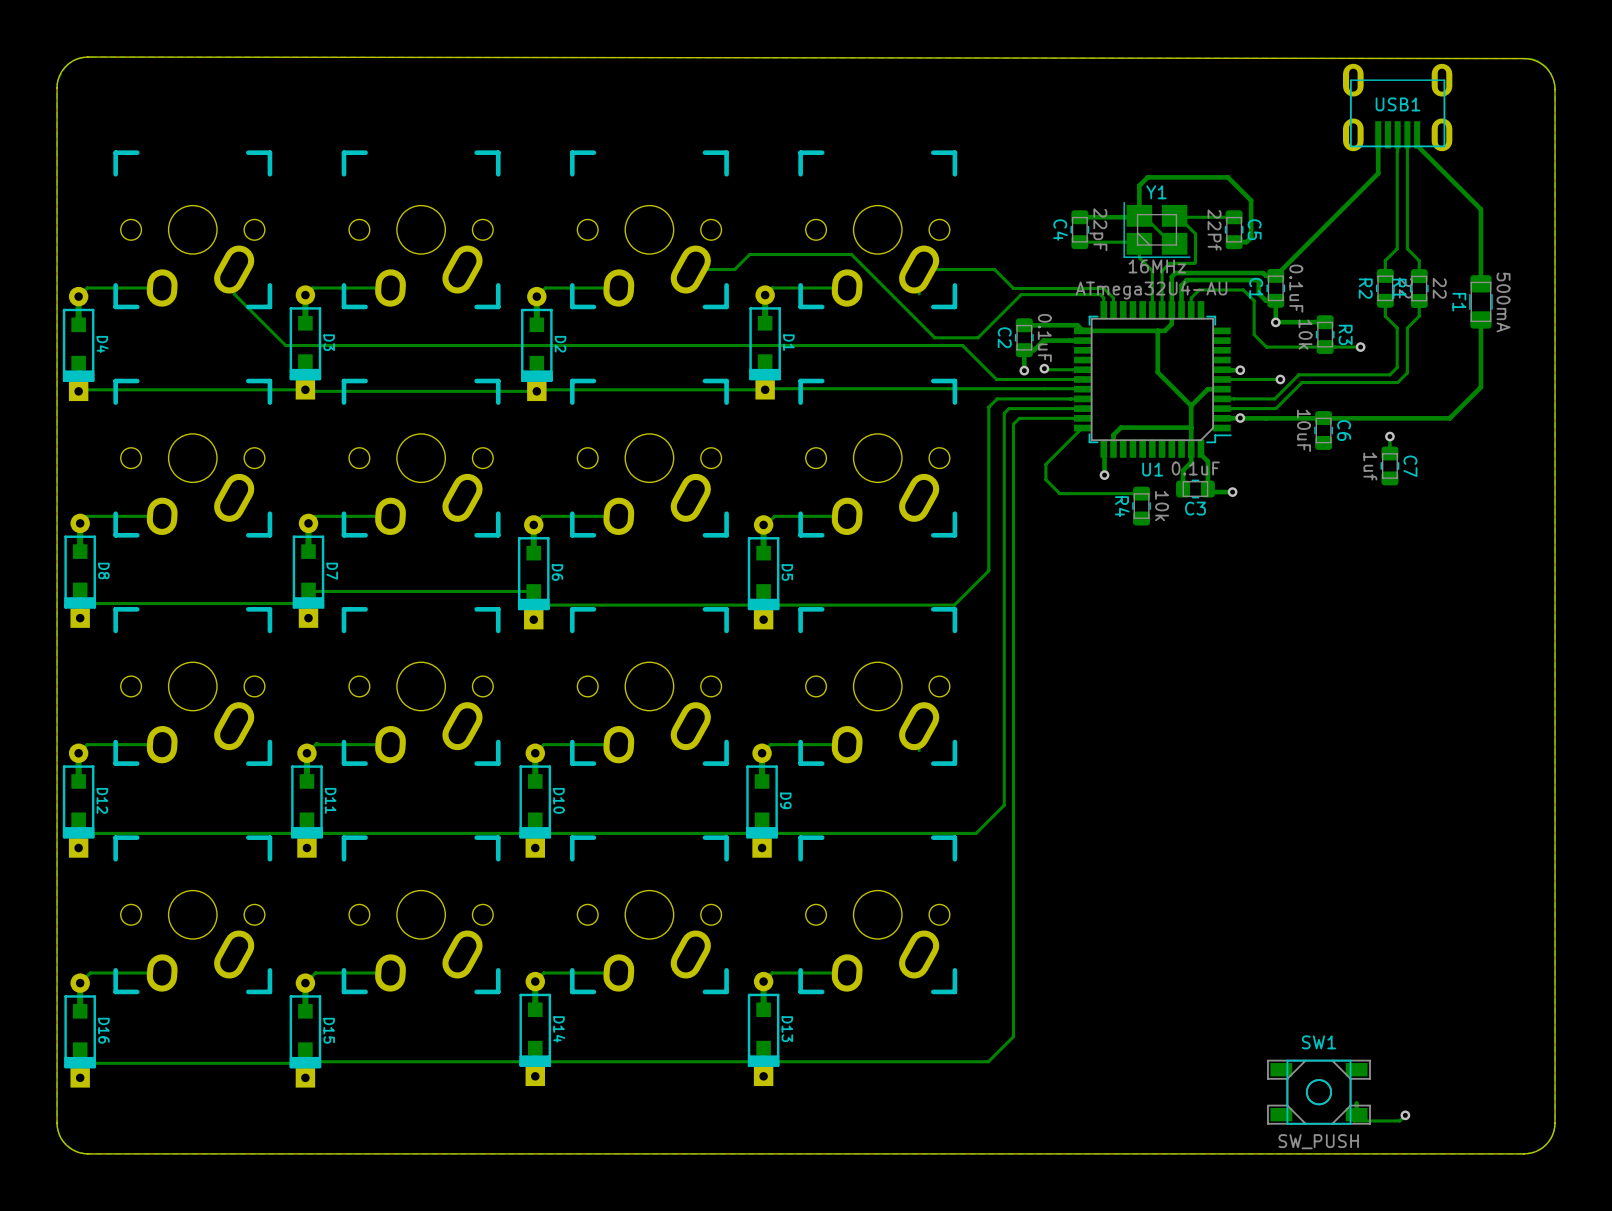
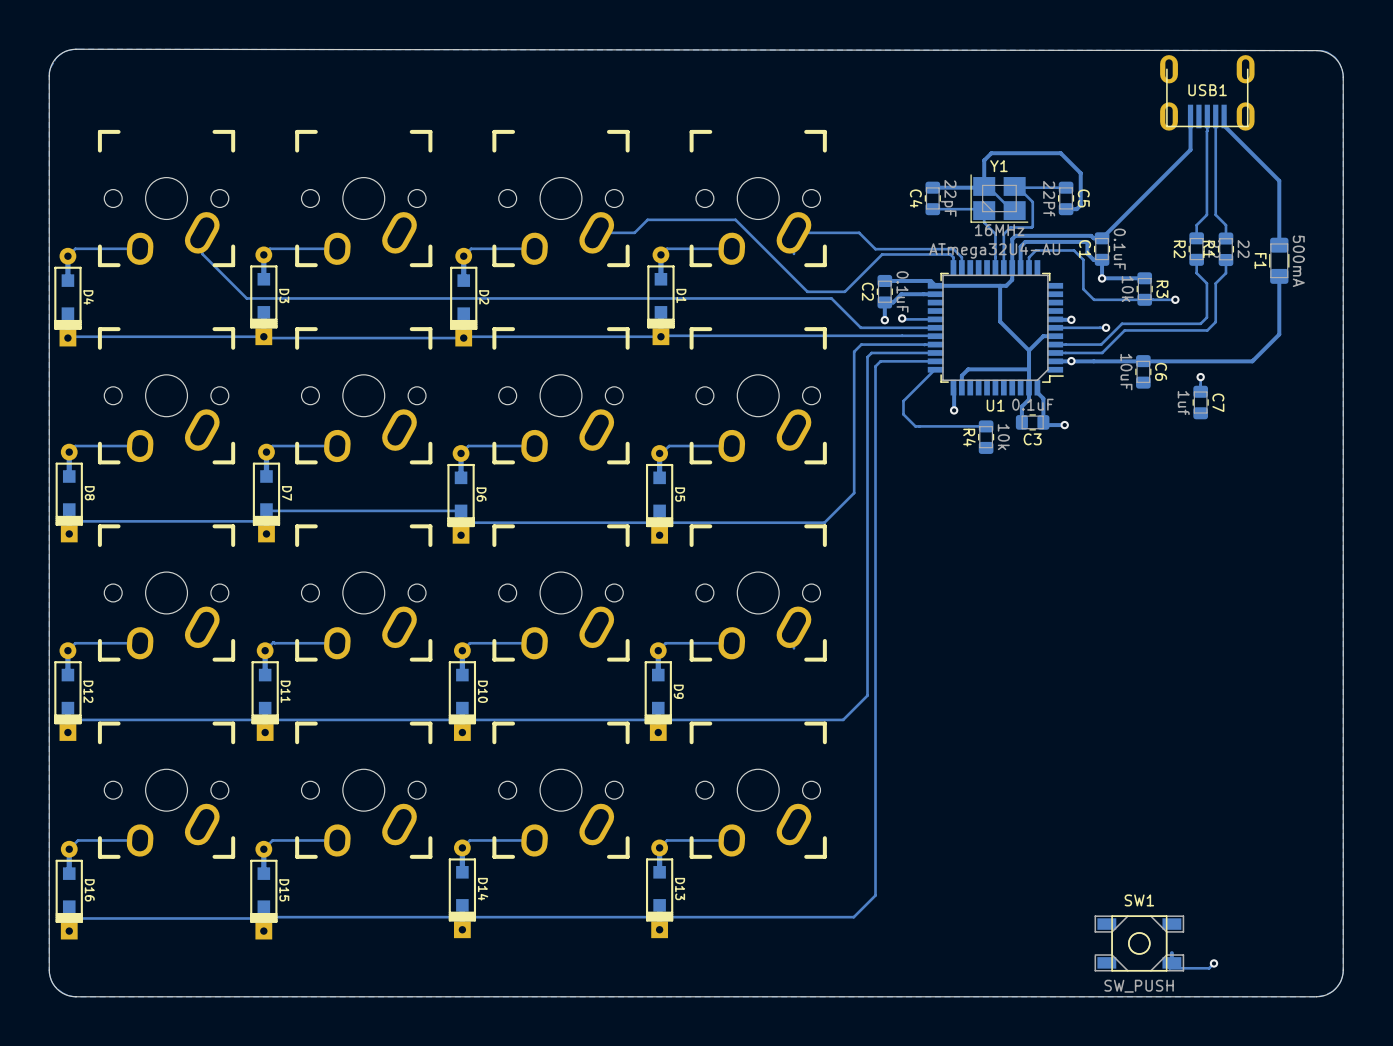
USB1 footprint: [1342, 63, 1453, 152] -> [1160, 55, 1255, 131]

